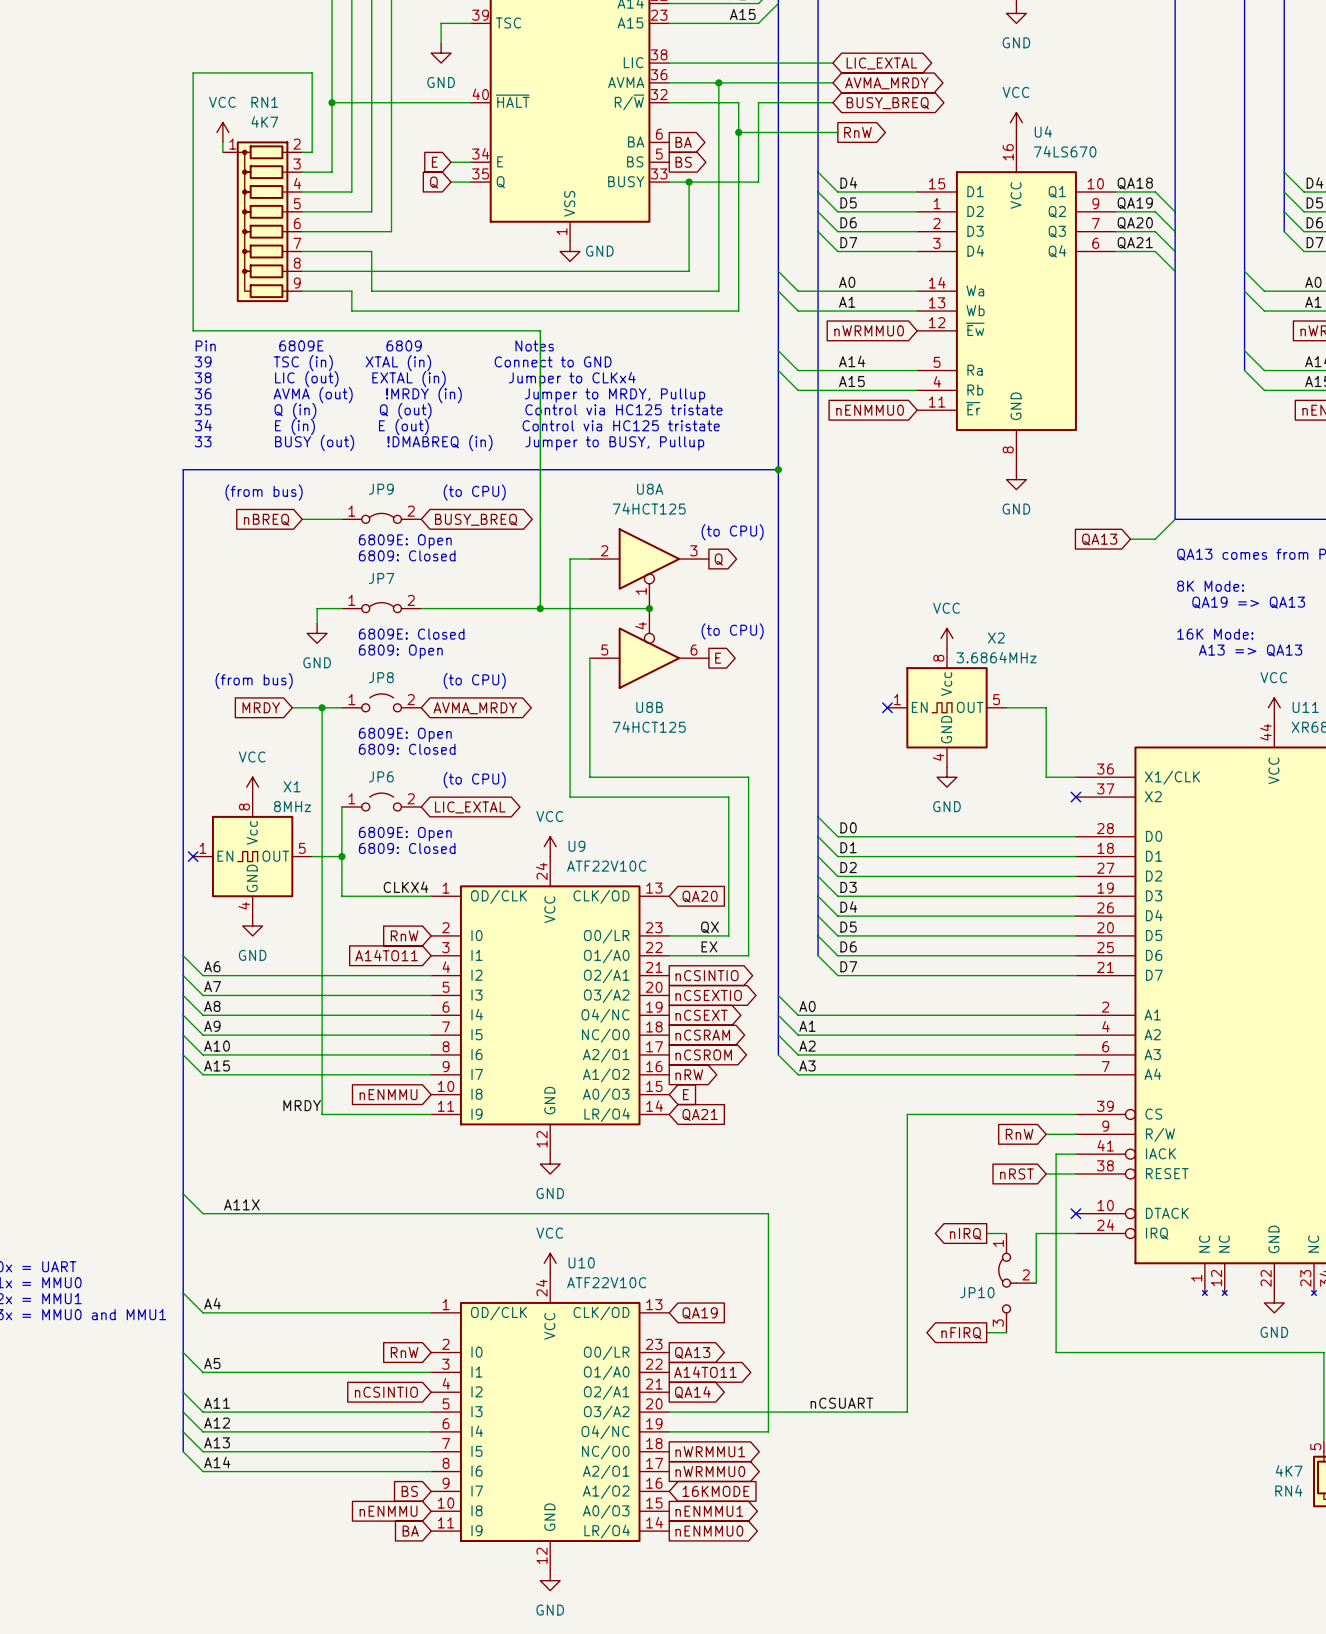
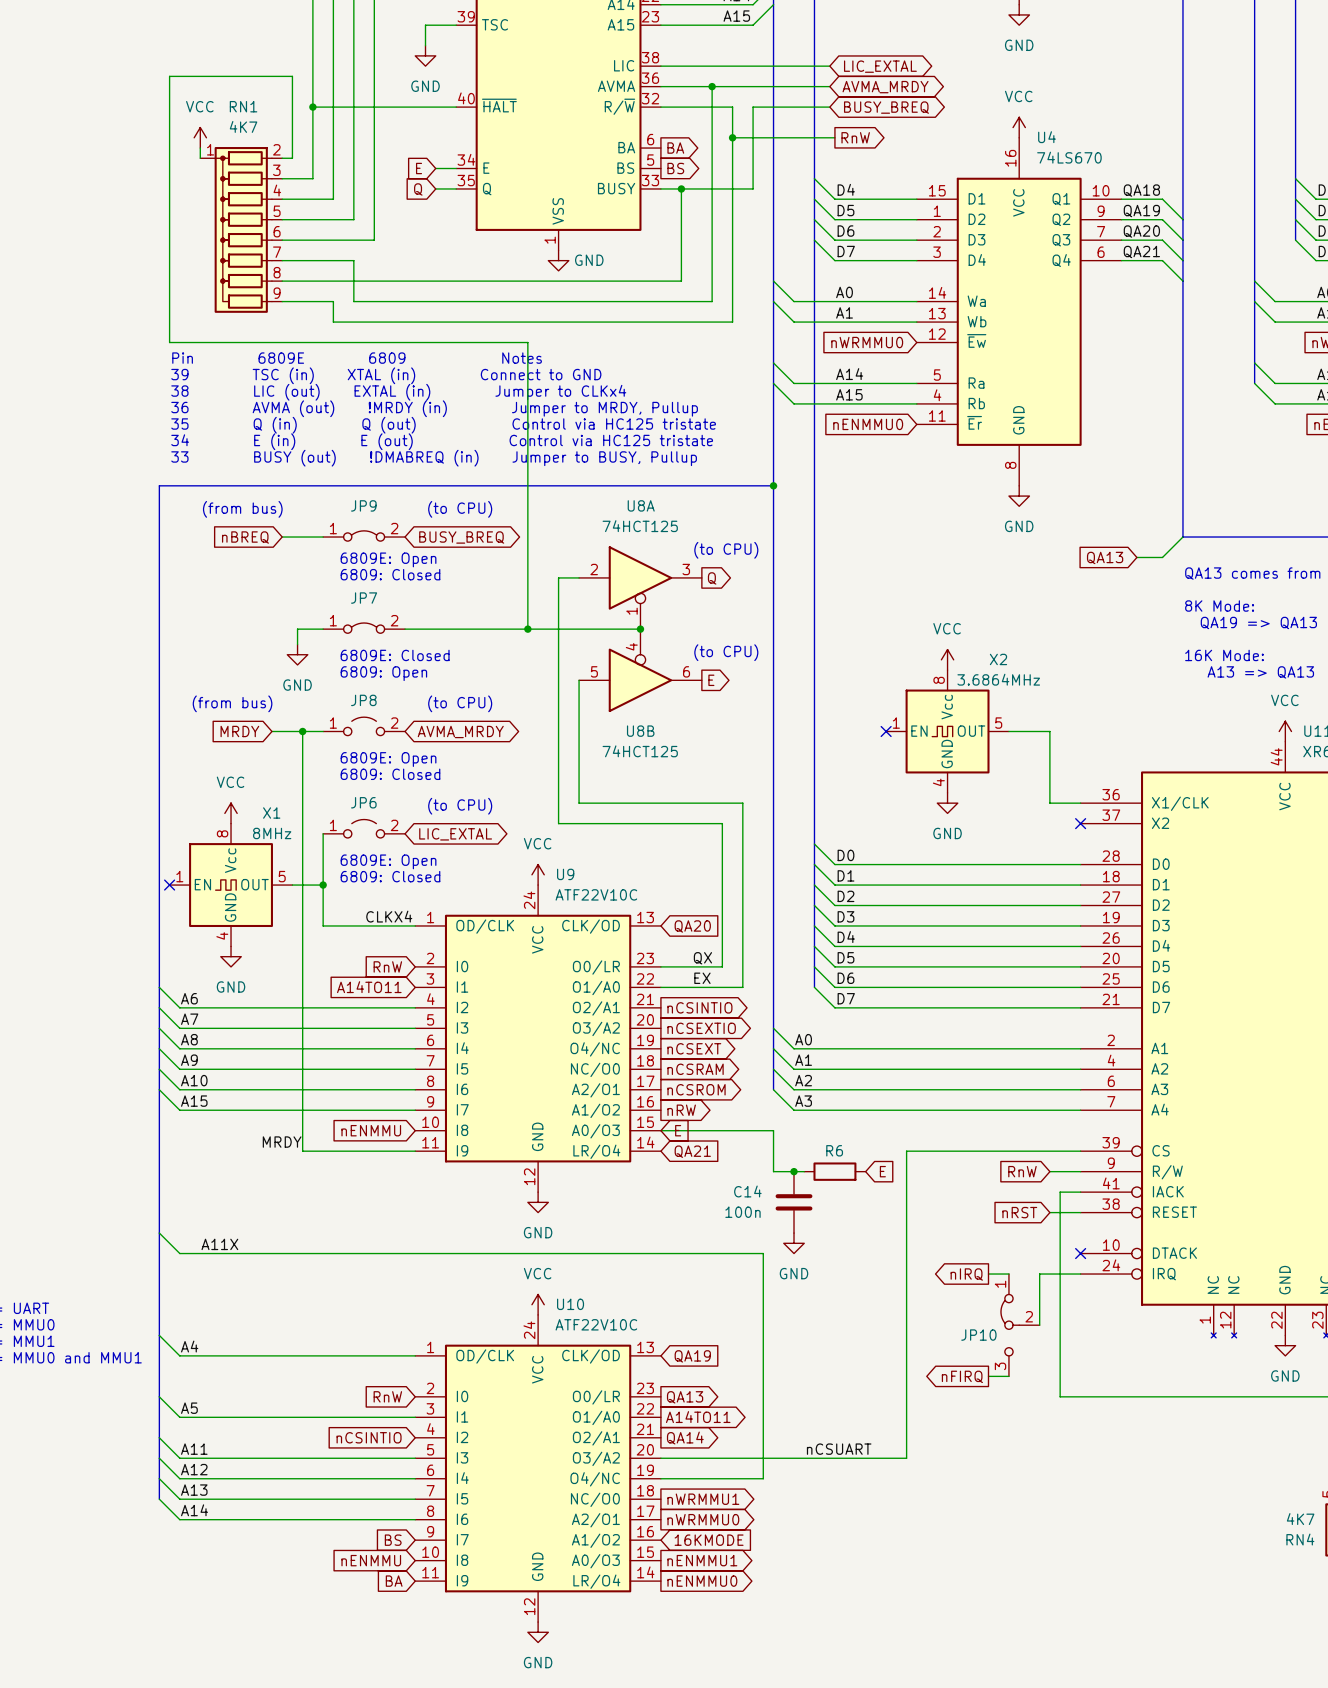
wire: none -> (660, 1130) (773, 1130) (773, 1171) (804, 1171)
junction: none -> (794, 1171)
R6: none -> (834, 1171)
global label: none -> E (882, 1171)
C14: none -> 100n (794, 1202)
power symbol: none -> GND (794, 1243)

